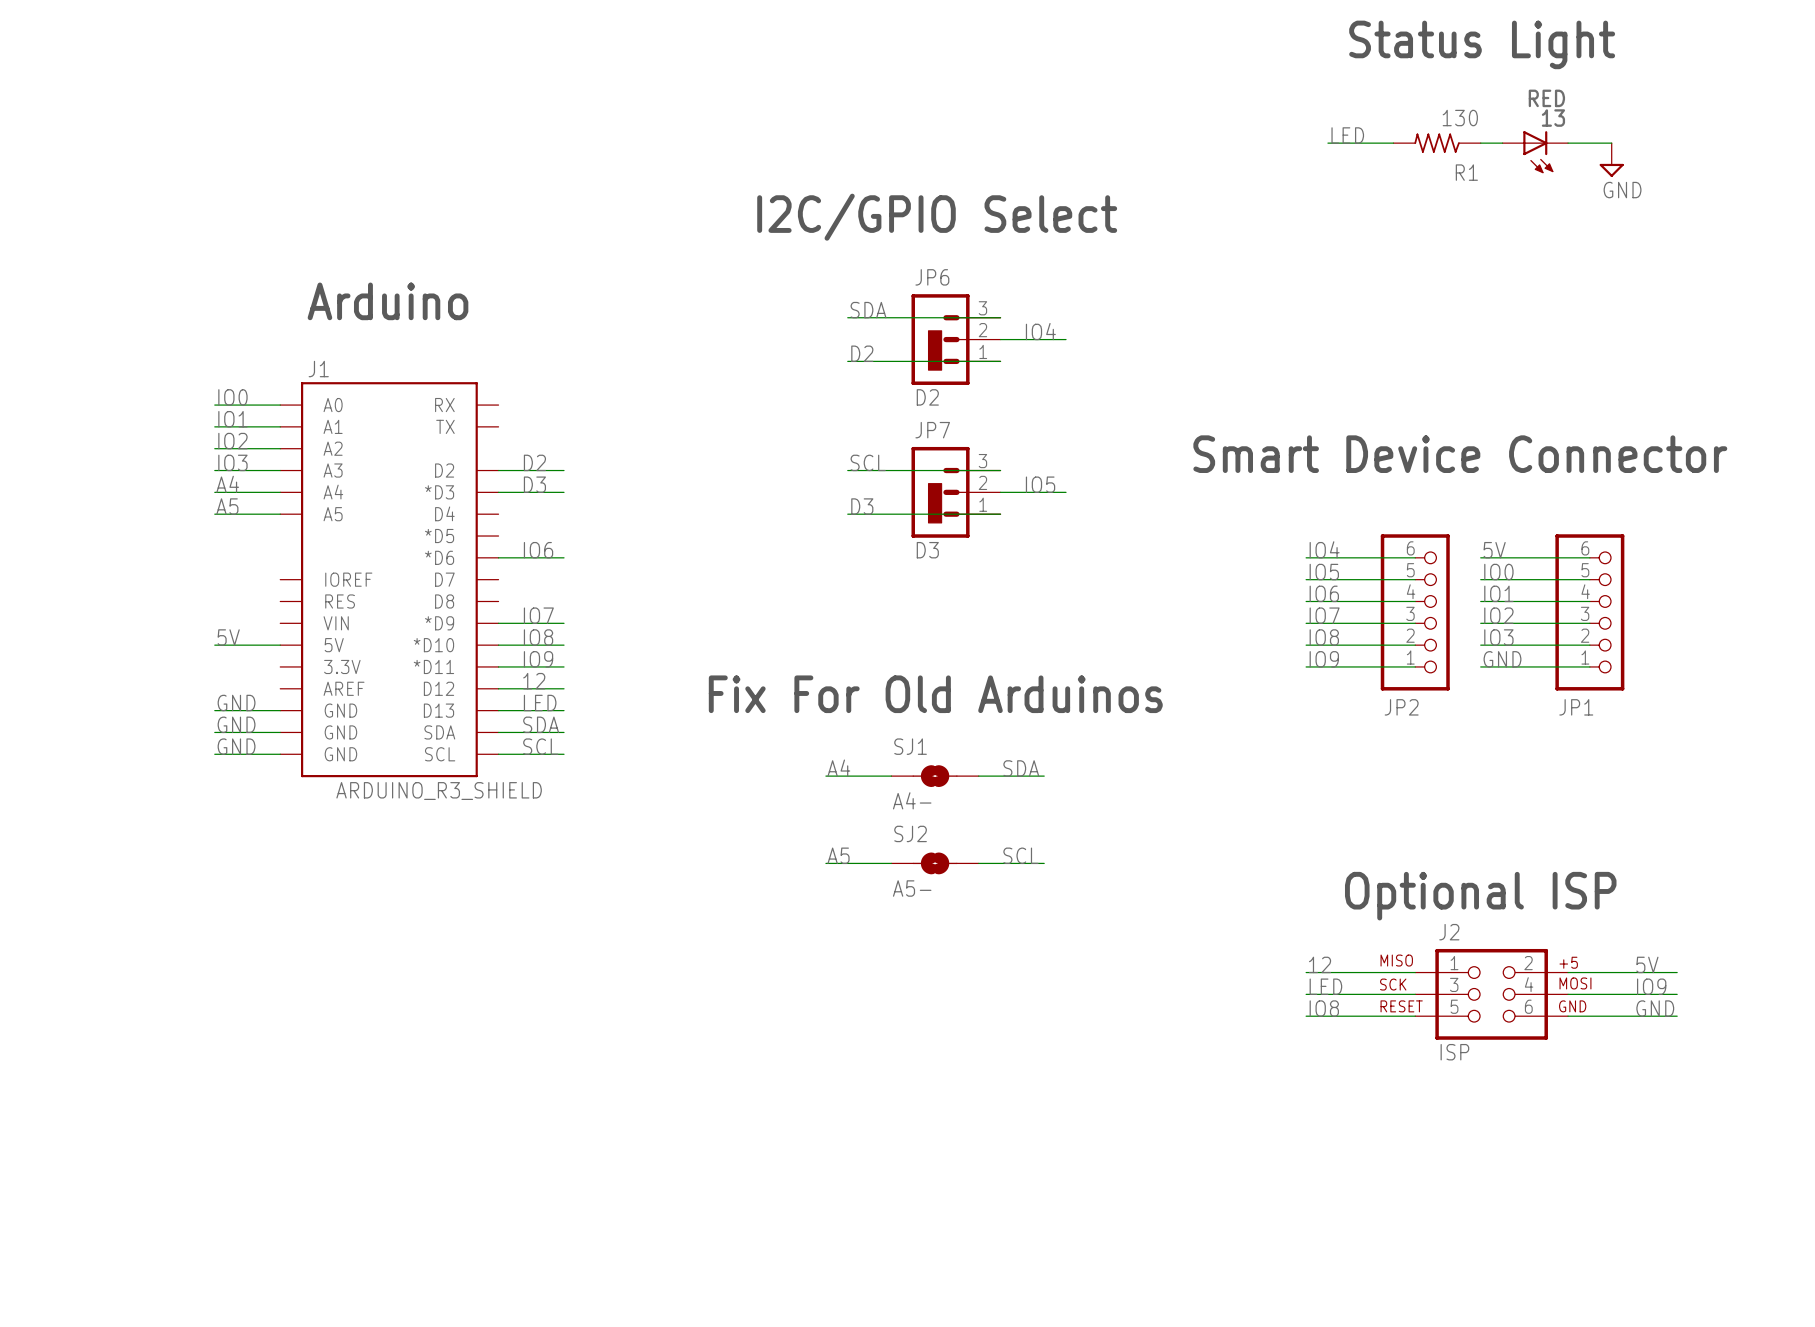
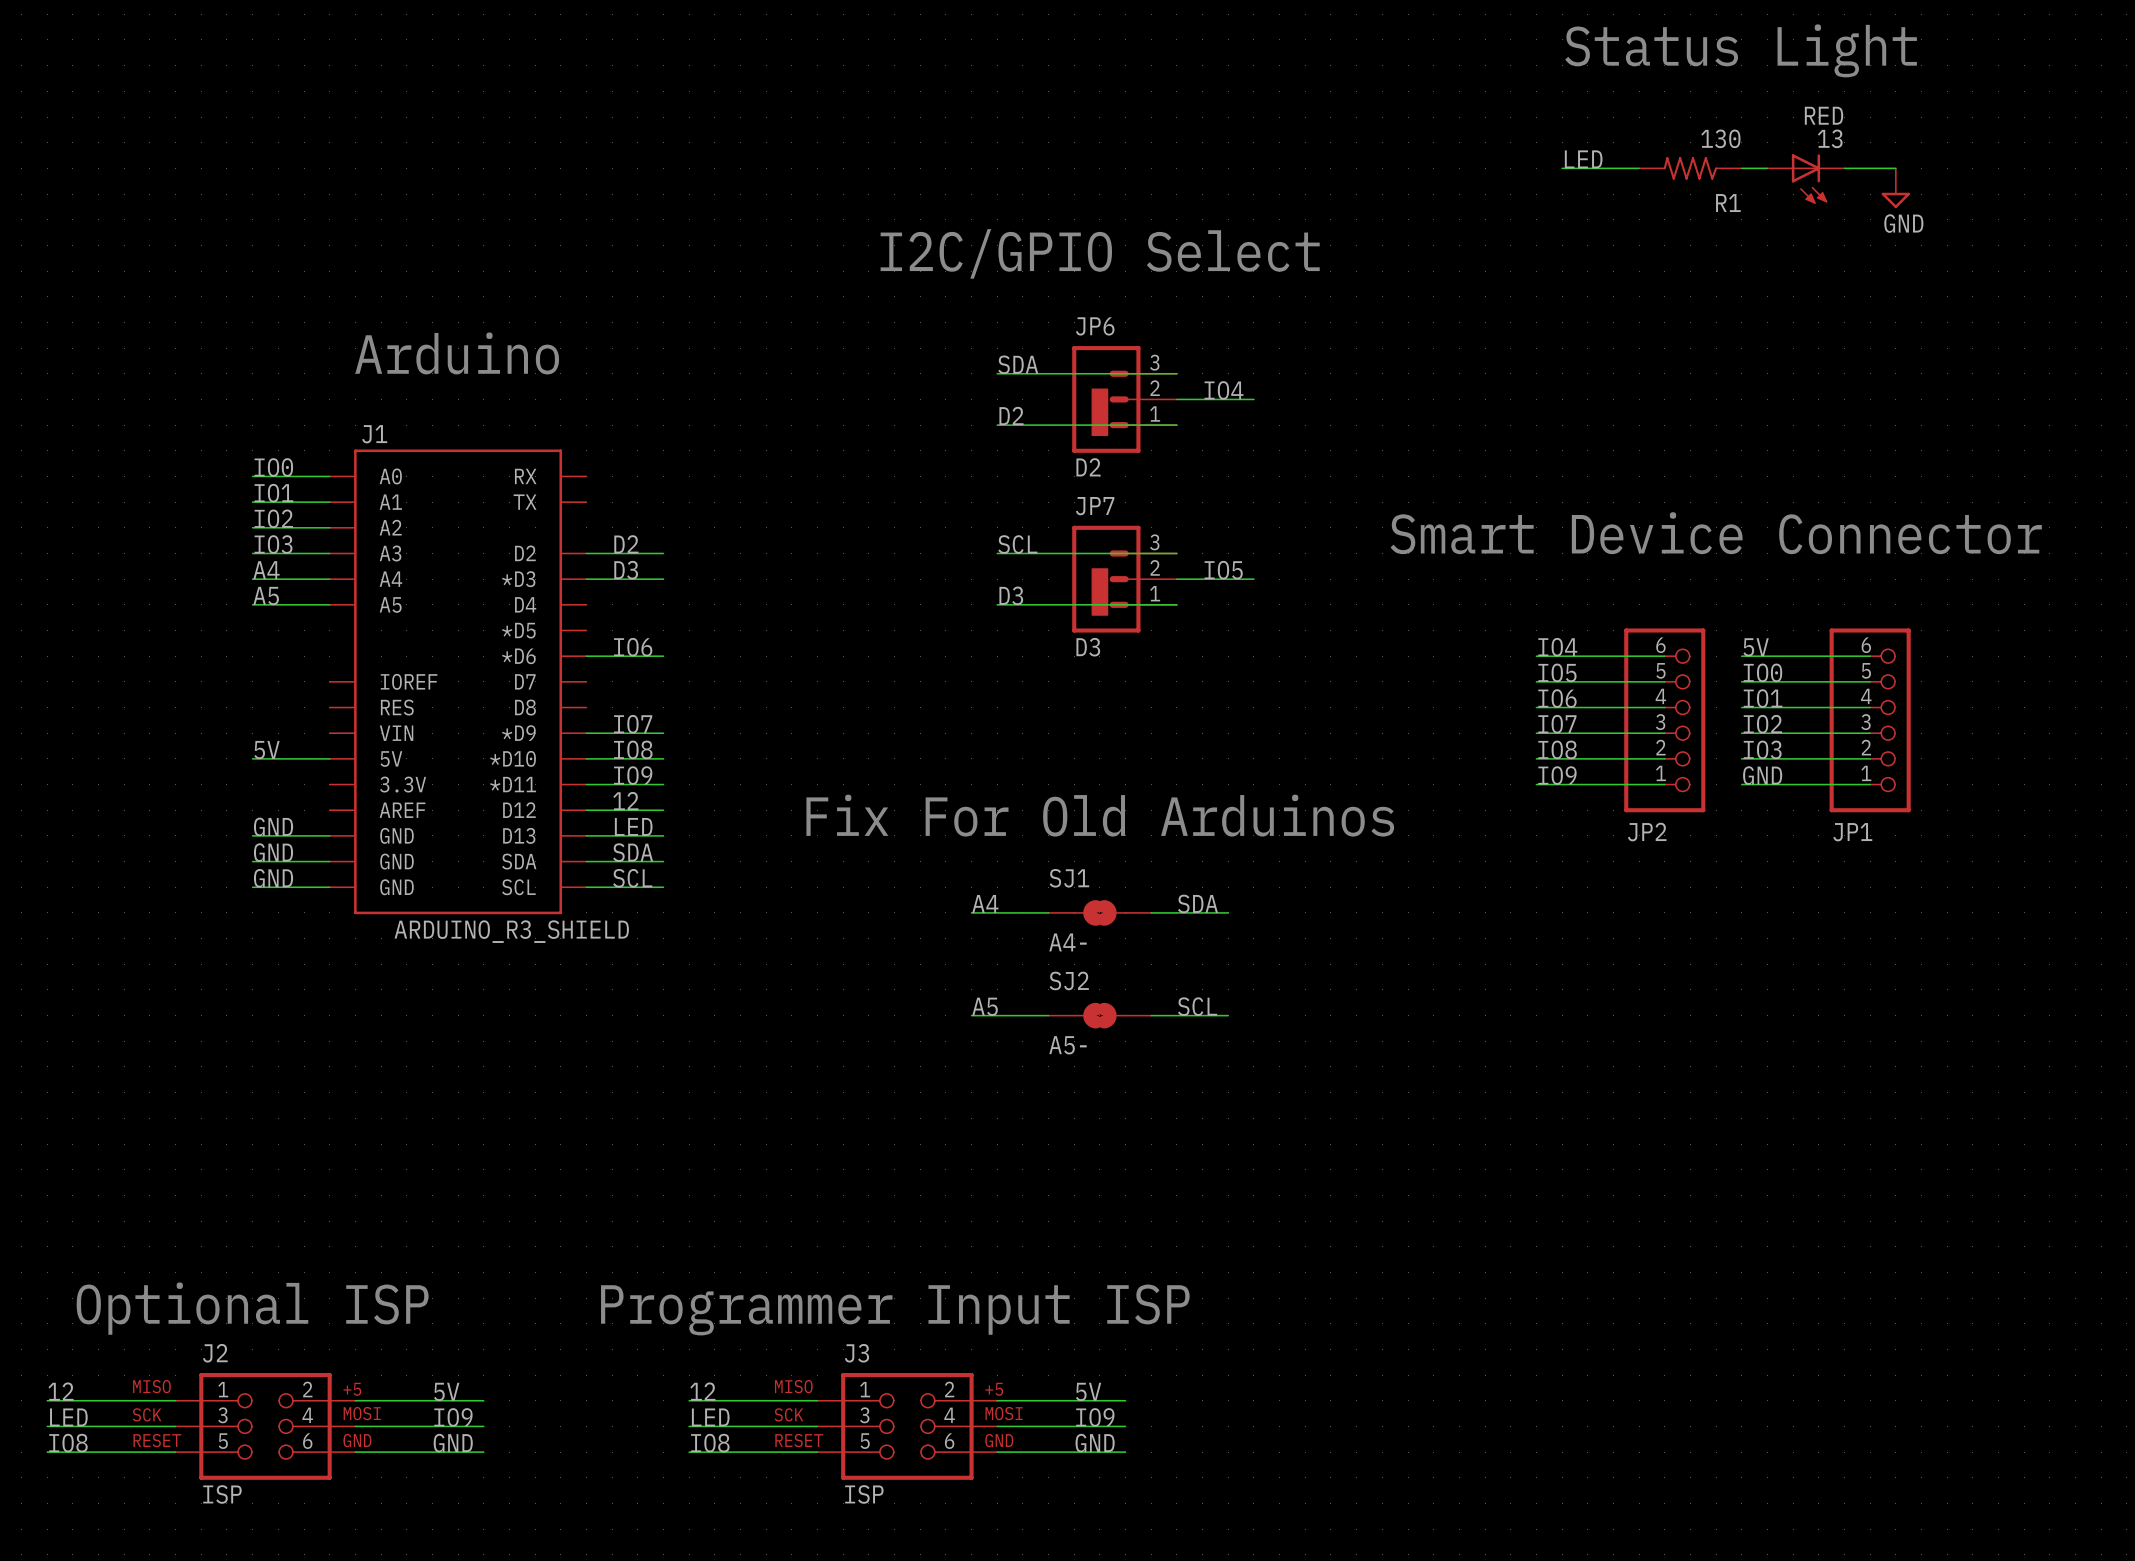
text: Optional ISP (1480, 896) -> none
label: 12 (1320, 964) -> none
label: 5V (1647, 964) -> none
wire: (1306, 972) (1415, 972) -> none
wire: (1568, 972) (1677, 972) -> none
label: LED (1325, 986) -> none
label: IO9 (1651, 986) -> none
wire: (1306, 994) (1415, 994) -> none
J2 position: (1491, 994) -> (265, 1426)
wire: (1568, 994) (1677, 994) -> none
label: IO8 (1324, 1008) -> none
label: GND (1655, 1008) -> none
wire: (1306, 1016) (1415, 1016) -> none
wire: (1568, 1016) (1677, 1016) -> none
text: none -> Optional ISP (252, 1308)
text: none -> Programmer Input ISP (895, 1309)
label: none -> 12 (61, 1391)
label: none -> 5V (446, 1391)
label: none -> 12 (702, 1391)
label: none -> 5V (1088, 1391)
wire: none -> (47, 1400) (175, 1400)
wire: none -> (355, 1400) (483, 1400)
wire: none -> (689, 1400) (817, 1400)
wire: none -> (997, 1400) (1125, 1400)
label: none -> LED (68, 1417)
label: none -> IO9 (453, 1417)
label: none -> LED (710, 1417)
label: none -> IO9 (1095, 1417)
wire: none -> (47, 1426) (175, 1426)
wire: none -> (355, 1426) (483, 1426)
wire: none -> (689, 1426) (817, 1426)
J3: none -> ISP (907, 1426)
wire: none -> (997, 1426) (1125, 1426)
label: none -> IO8 (68, 1443)
label: none -> GND (453, 1443)
label: none -> IO8 (710, 1443)
label: none -> GND (1095, 1443)
wire: none -> (47, 1452) (175, 1452)
wire: none -> (355, 1452) (483, 1452)
wire: none -> (689, 1452) (817, 1452)
wire: none -> (997, 1452) (1125, 1452)

